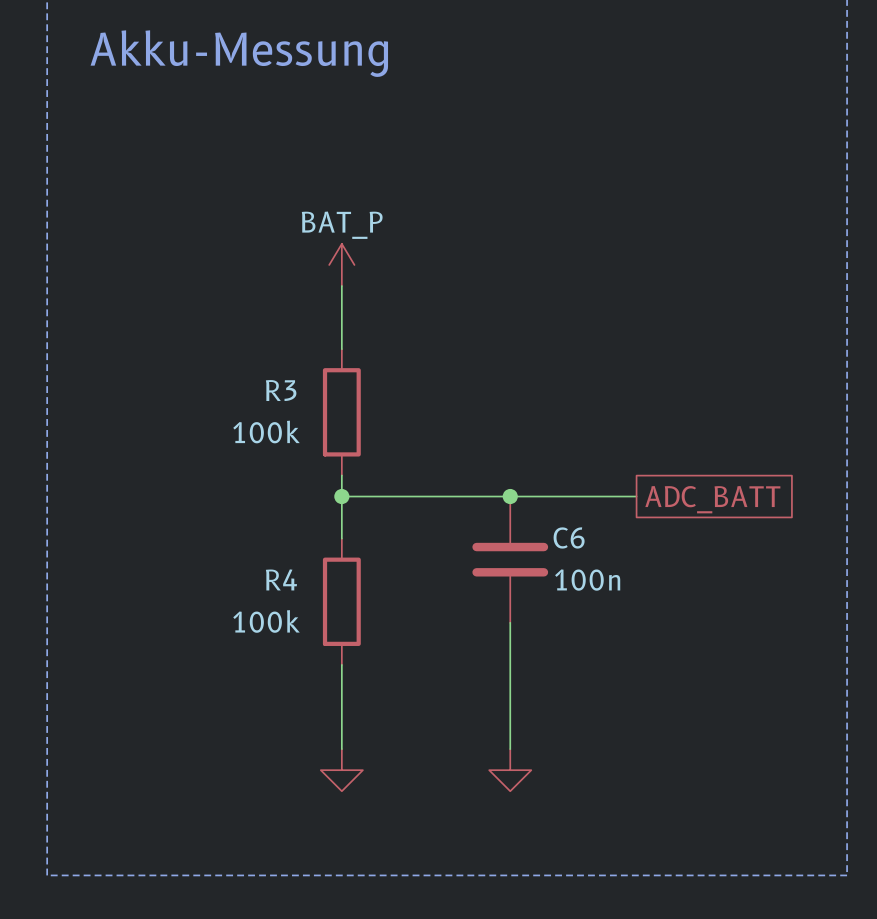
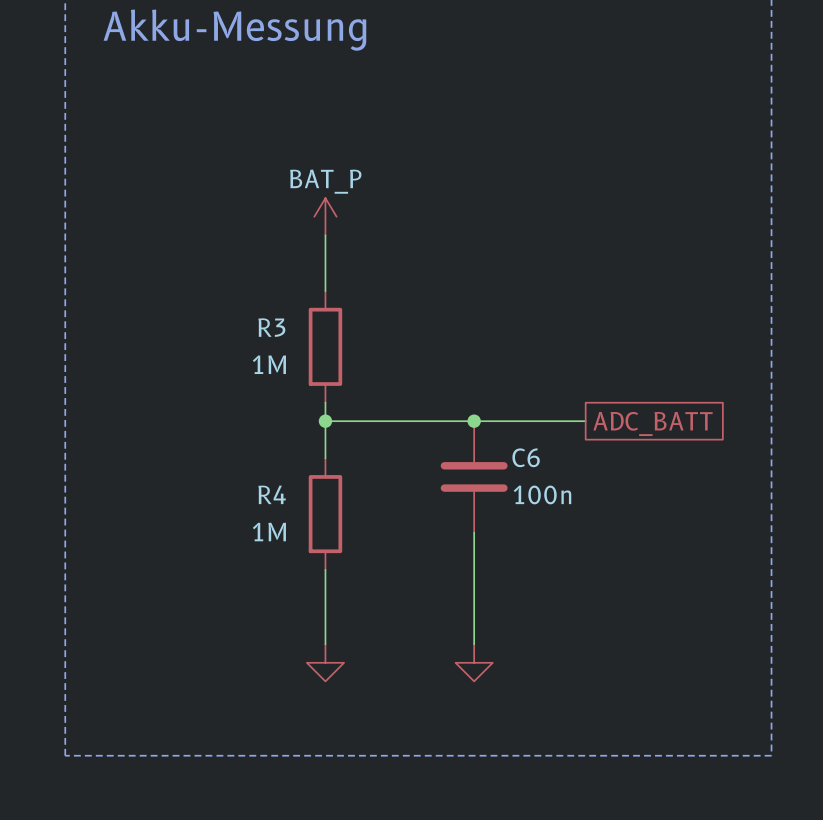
R3 value: 100k (266, 432) -> 1M (269, 364)
R4 value: 100k (266, 621) -> 1M (269, 532)

